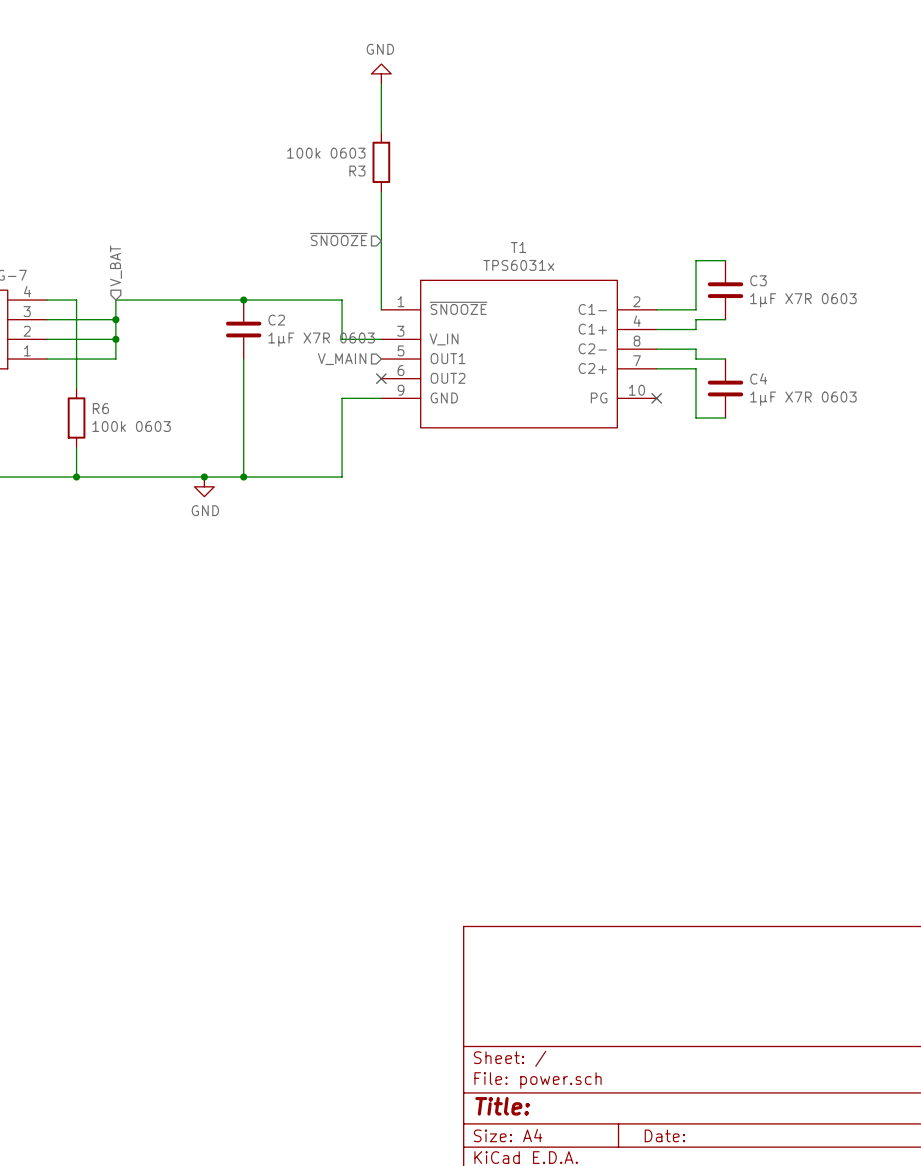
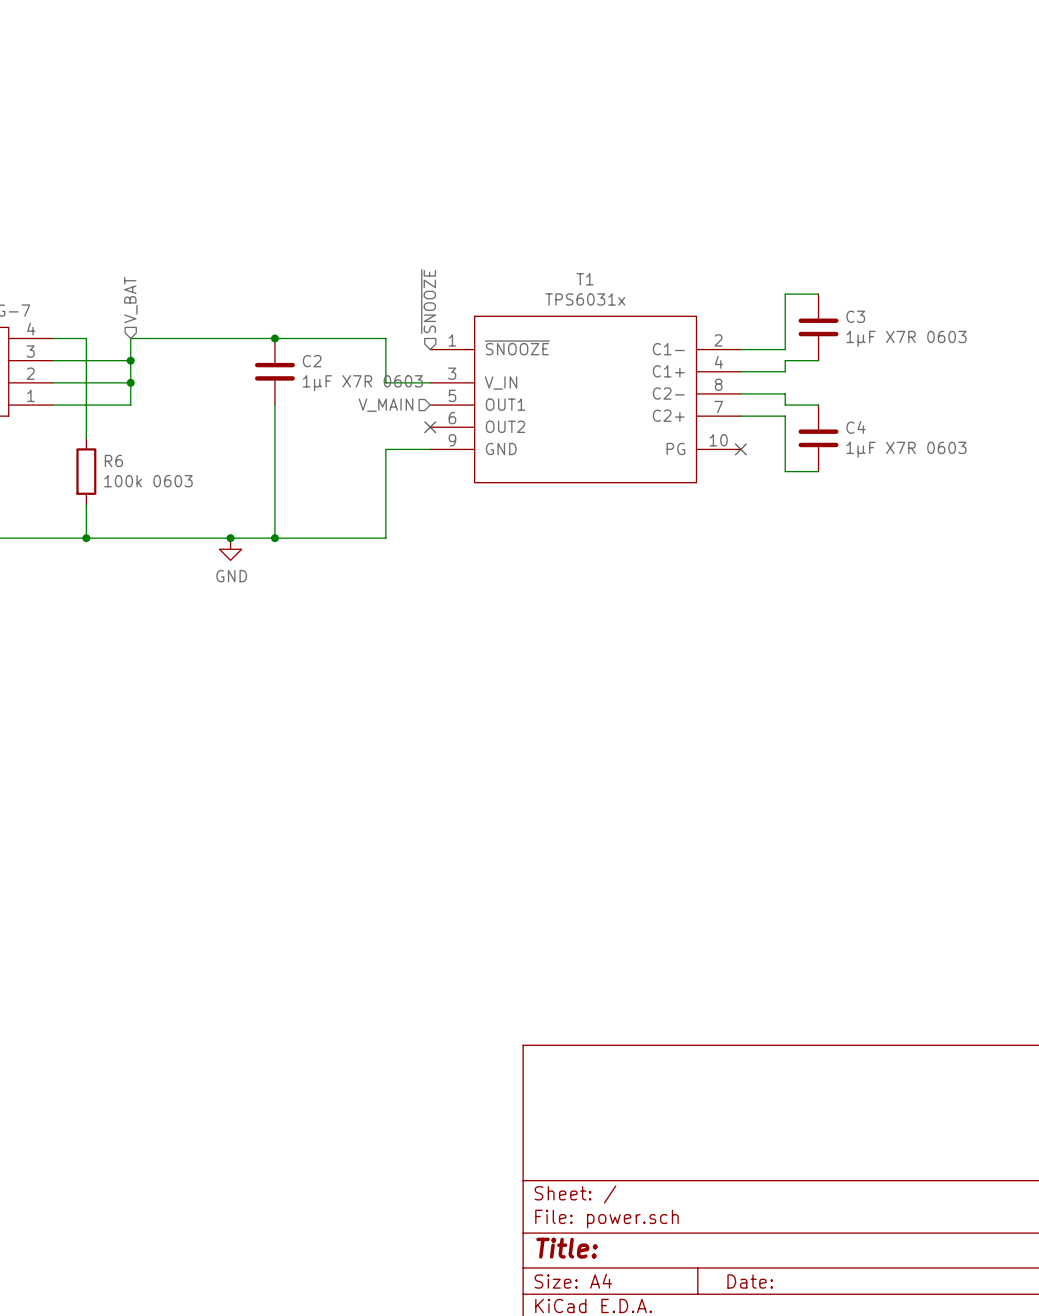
power symbol: GND (381, 73) -> none
wire: (381, 83) (381, 132) -> none
R3: 100k 0603 (381, 162) -> none
wire: (381, 191) (381, 309) -> none
hierarchical label rotation: 0° (338, 239) -> 90° clockwise (428, 301)

